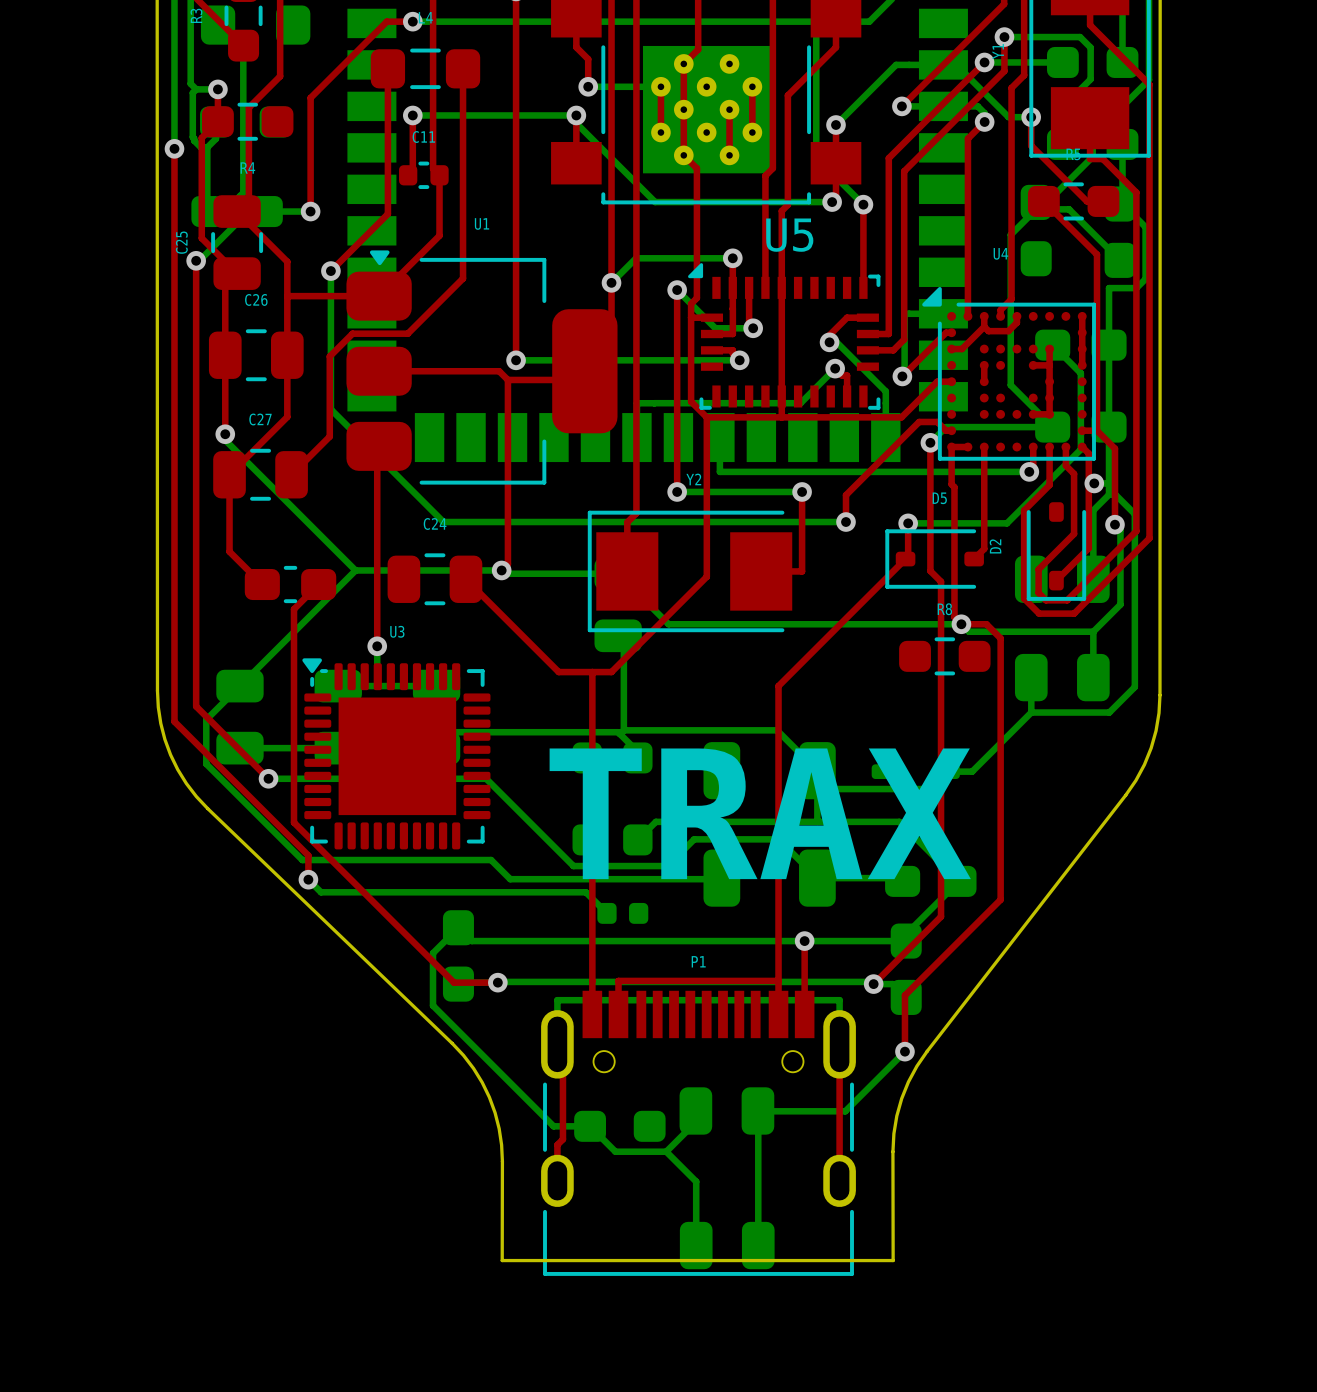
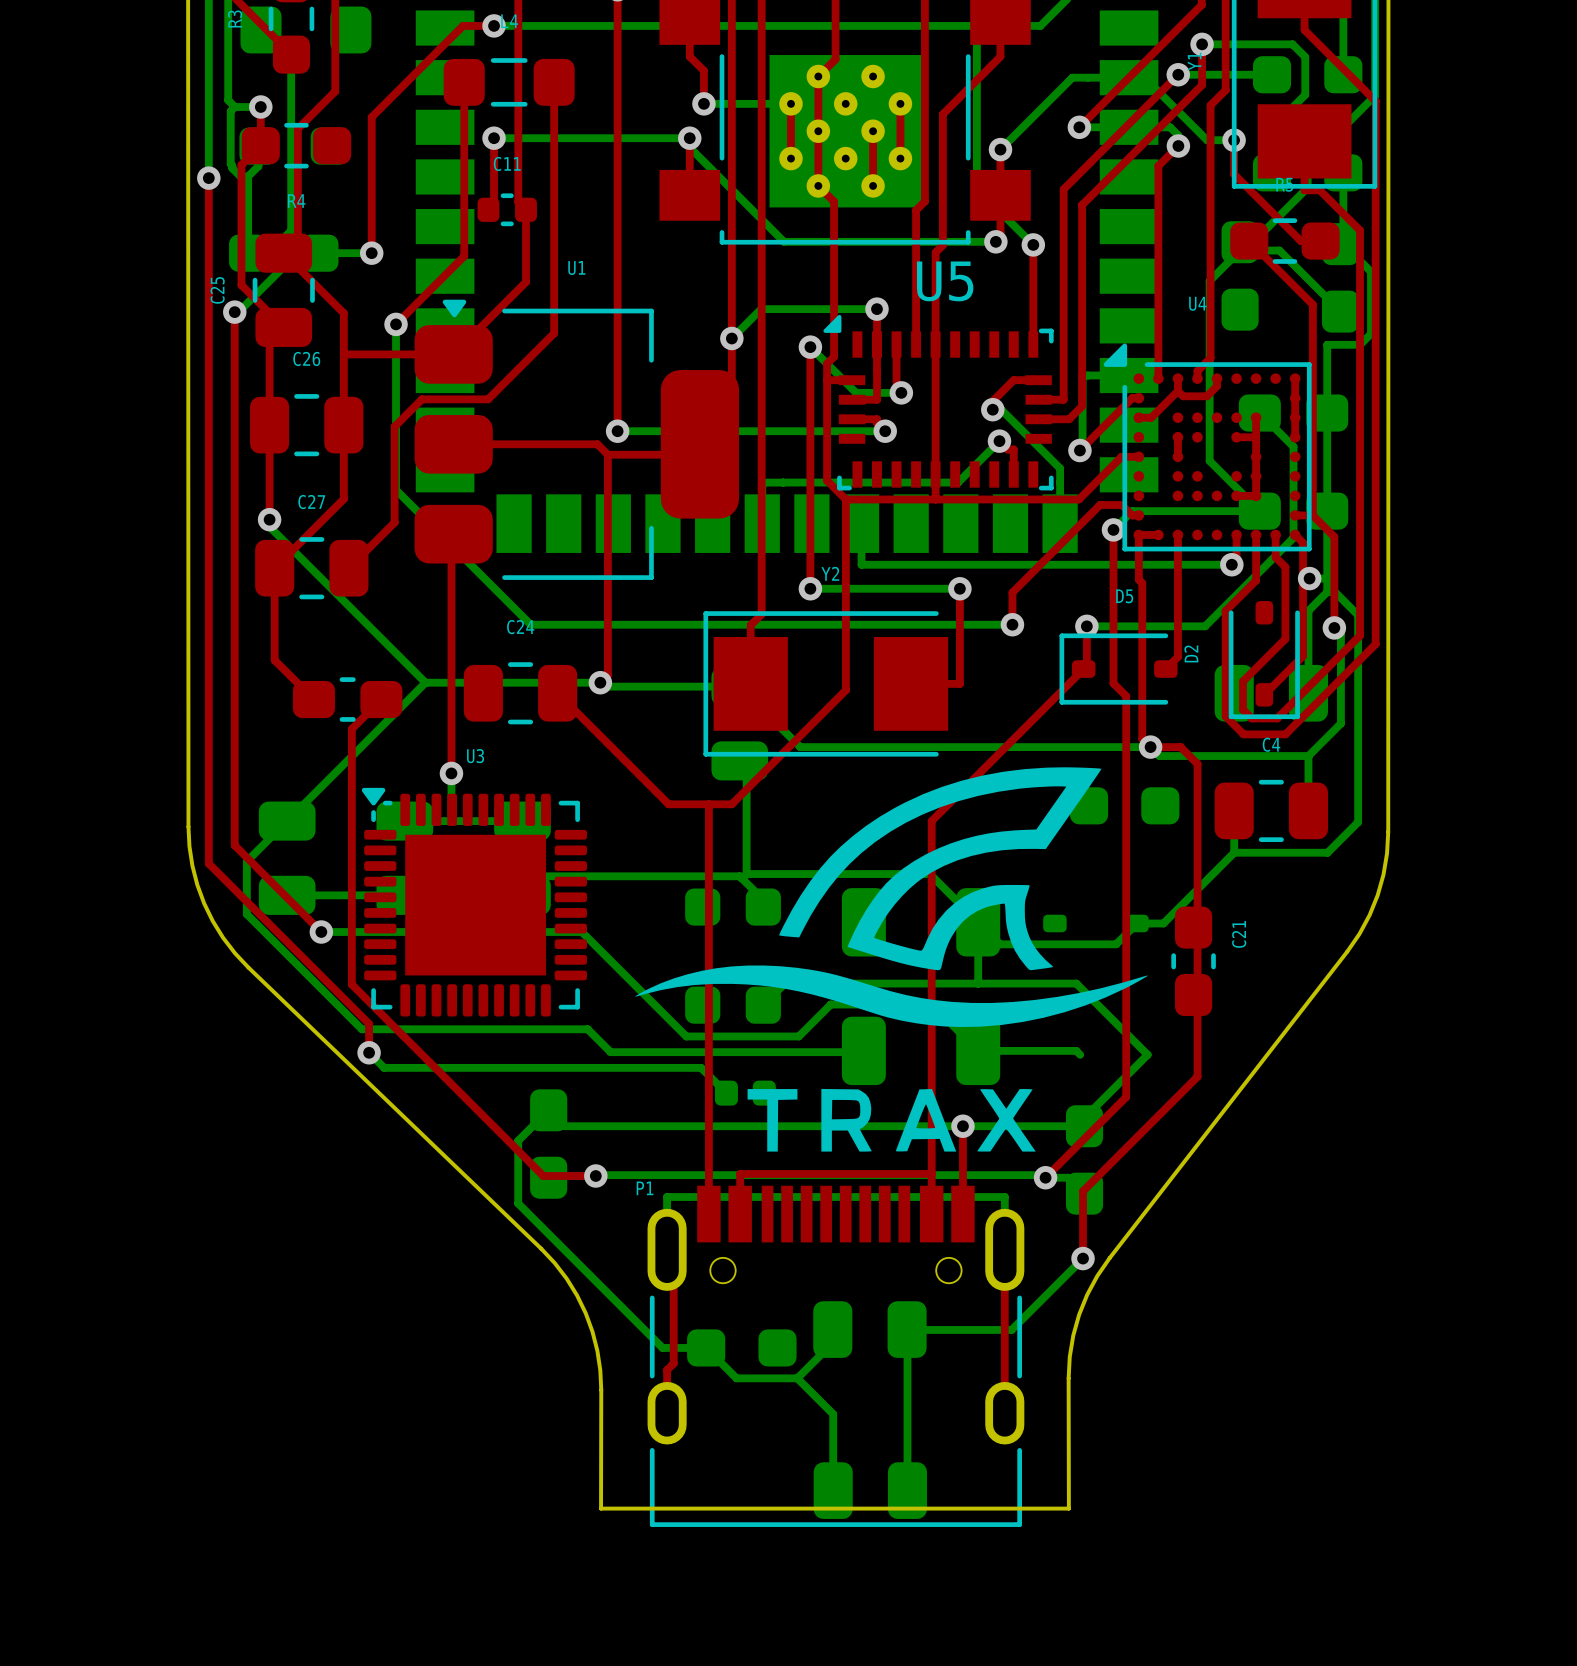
drawing: none -> [635, 767, 1148, 1152]
R8 side: top (944, 656) -> bottom (1124, 805)
C4 side: bottom (1062, 677) -> top (1271, 810)
text: TRAX (760, 813) -> none
C21 side: bottom (930, 881) -> top (1193, 961)
P1 name position: P1 (698, 961) -> P1 (645, 1188)

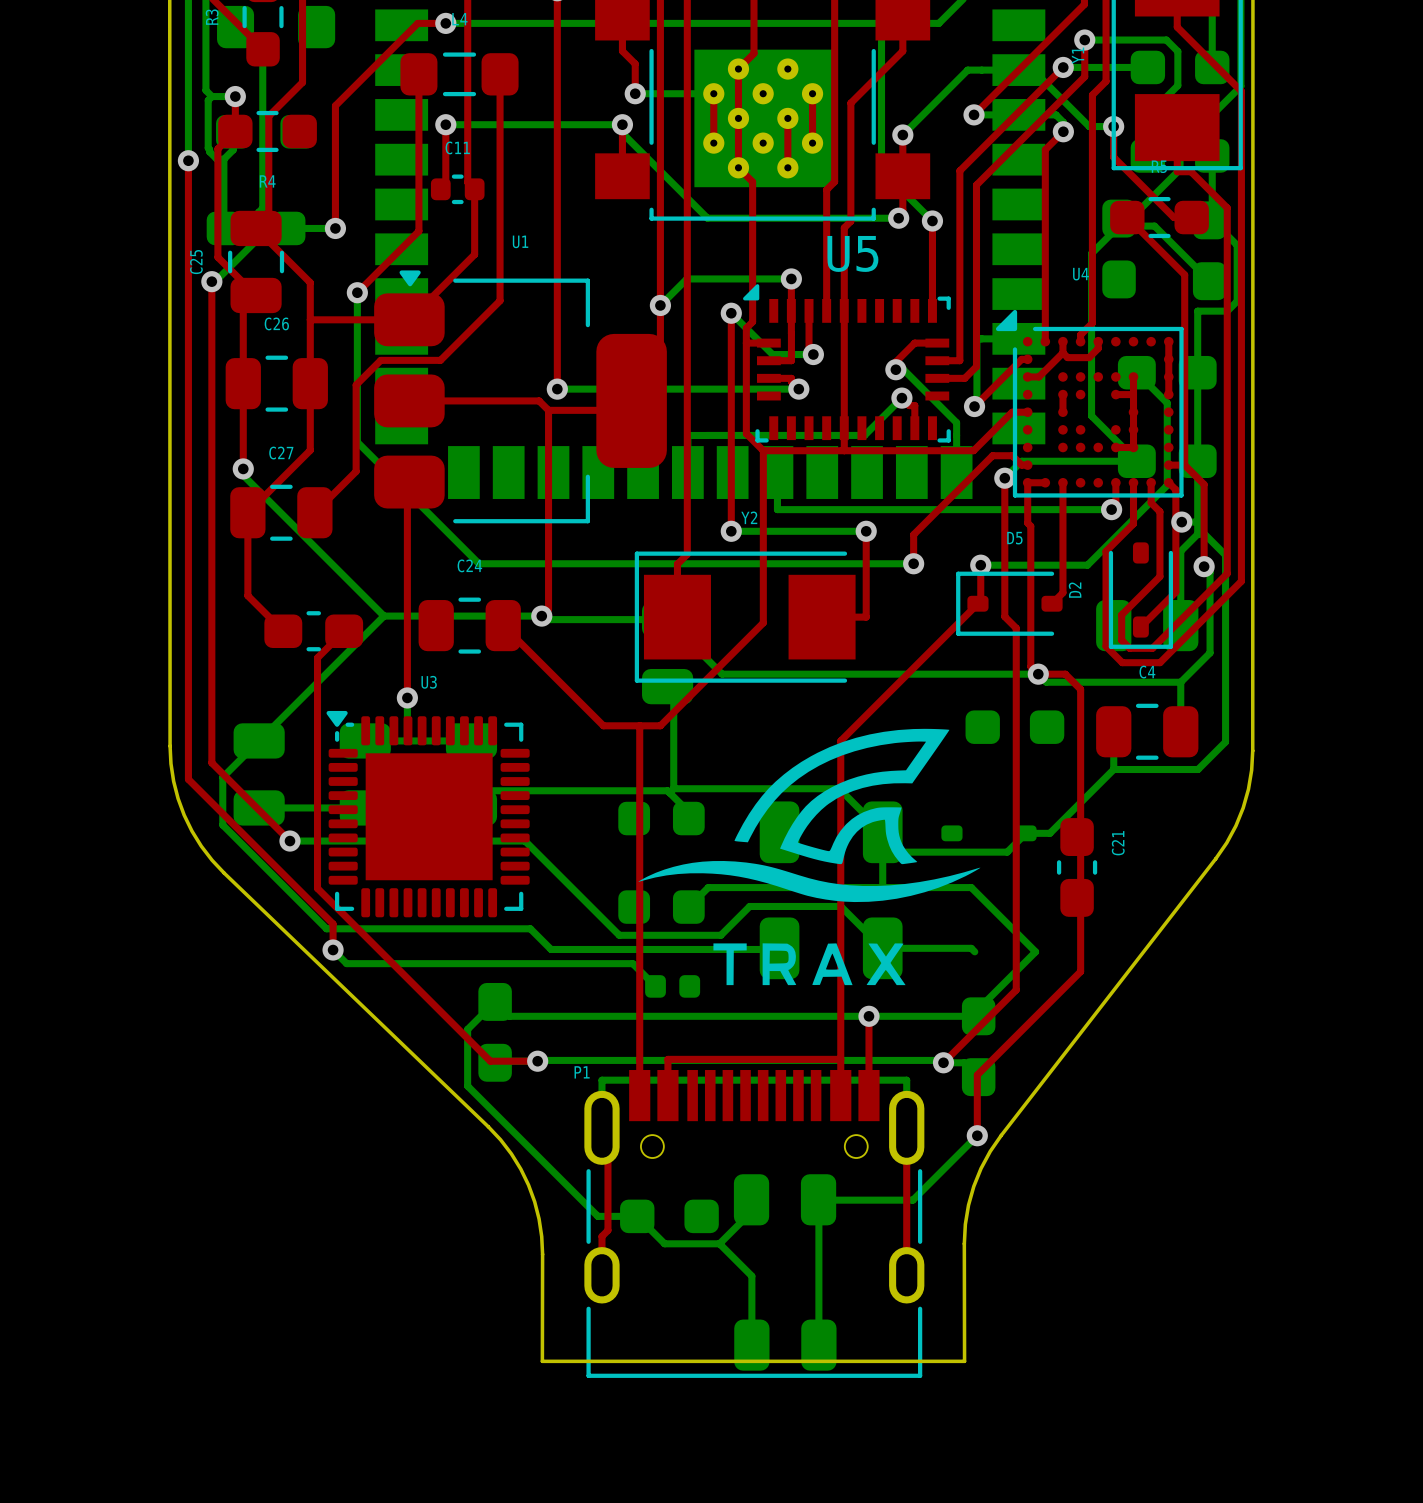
drawing shape: [635, 767, 1148, 1152] -> [638, 728, 981, 986]

